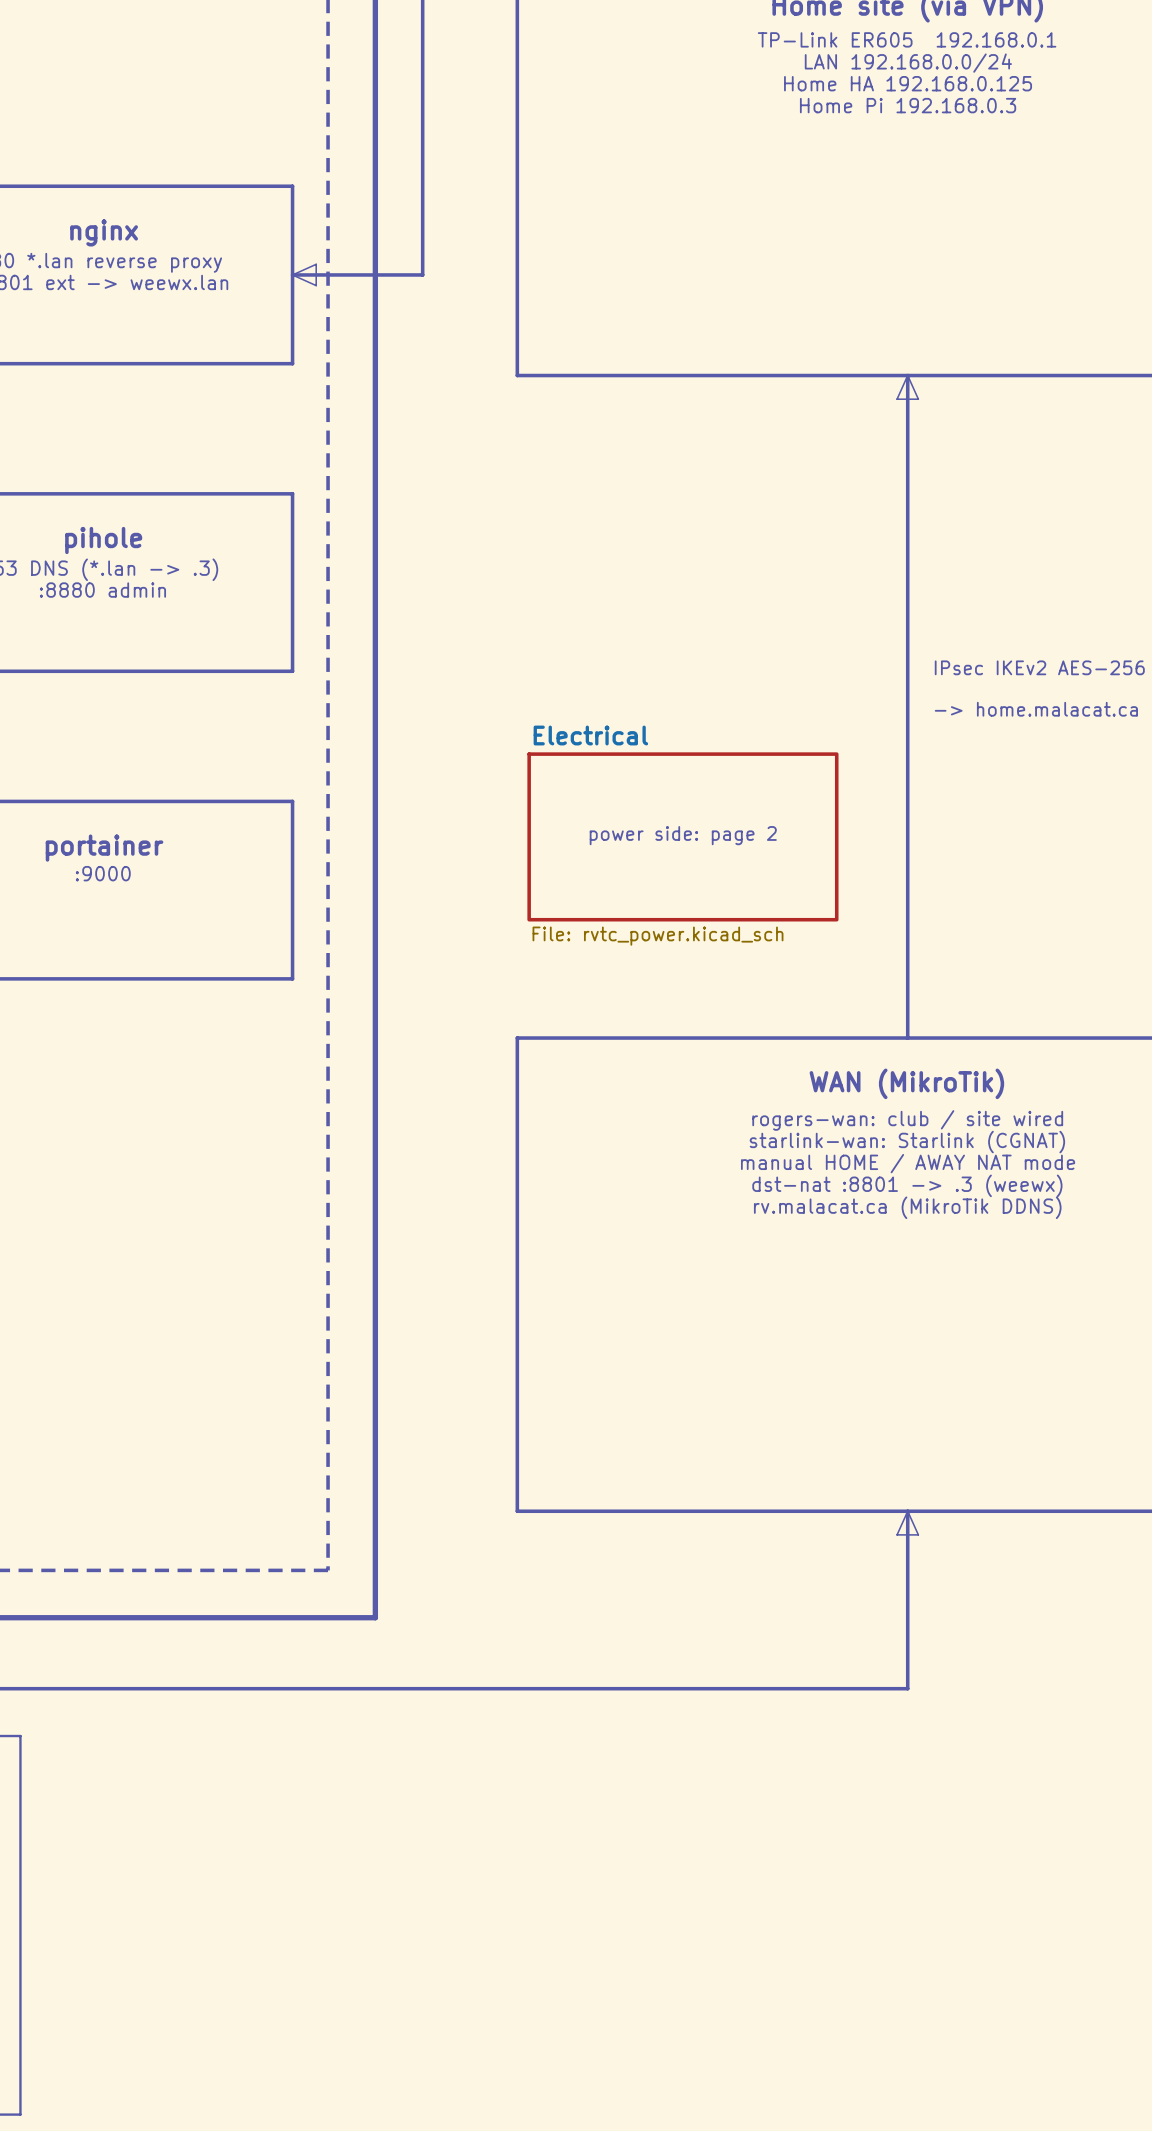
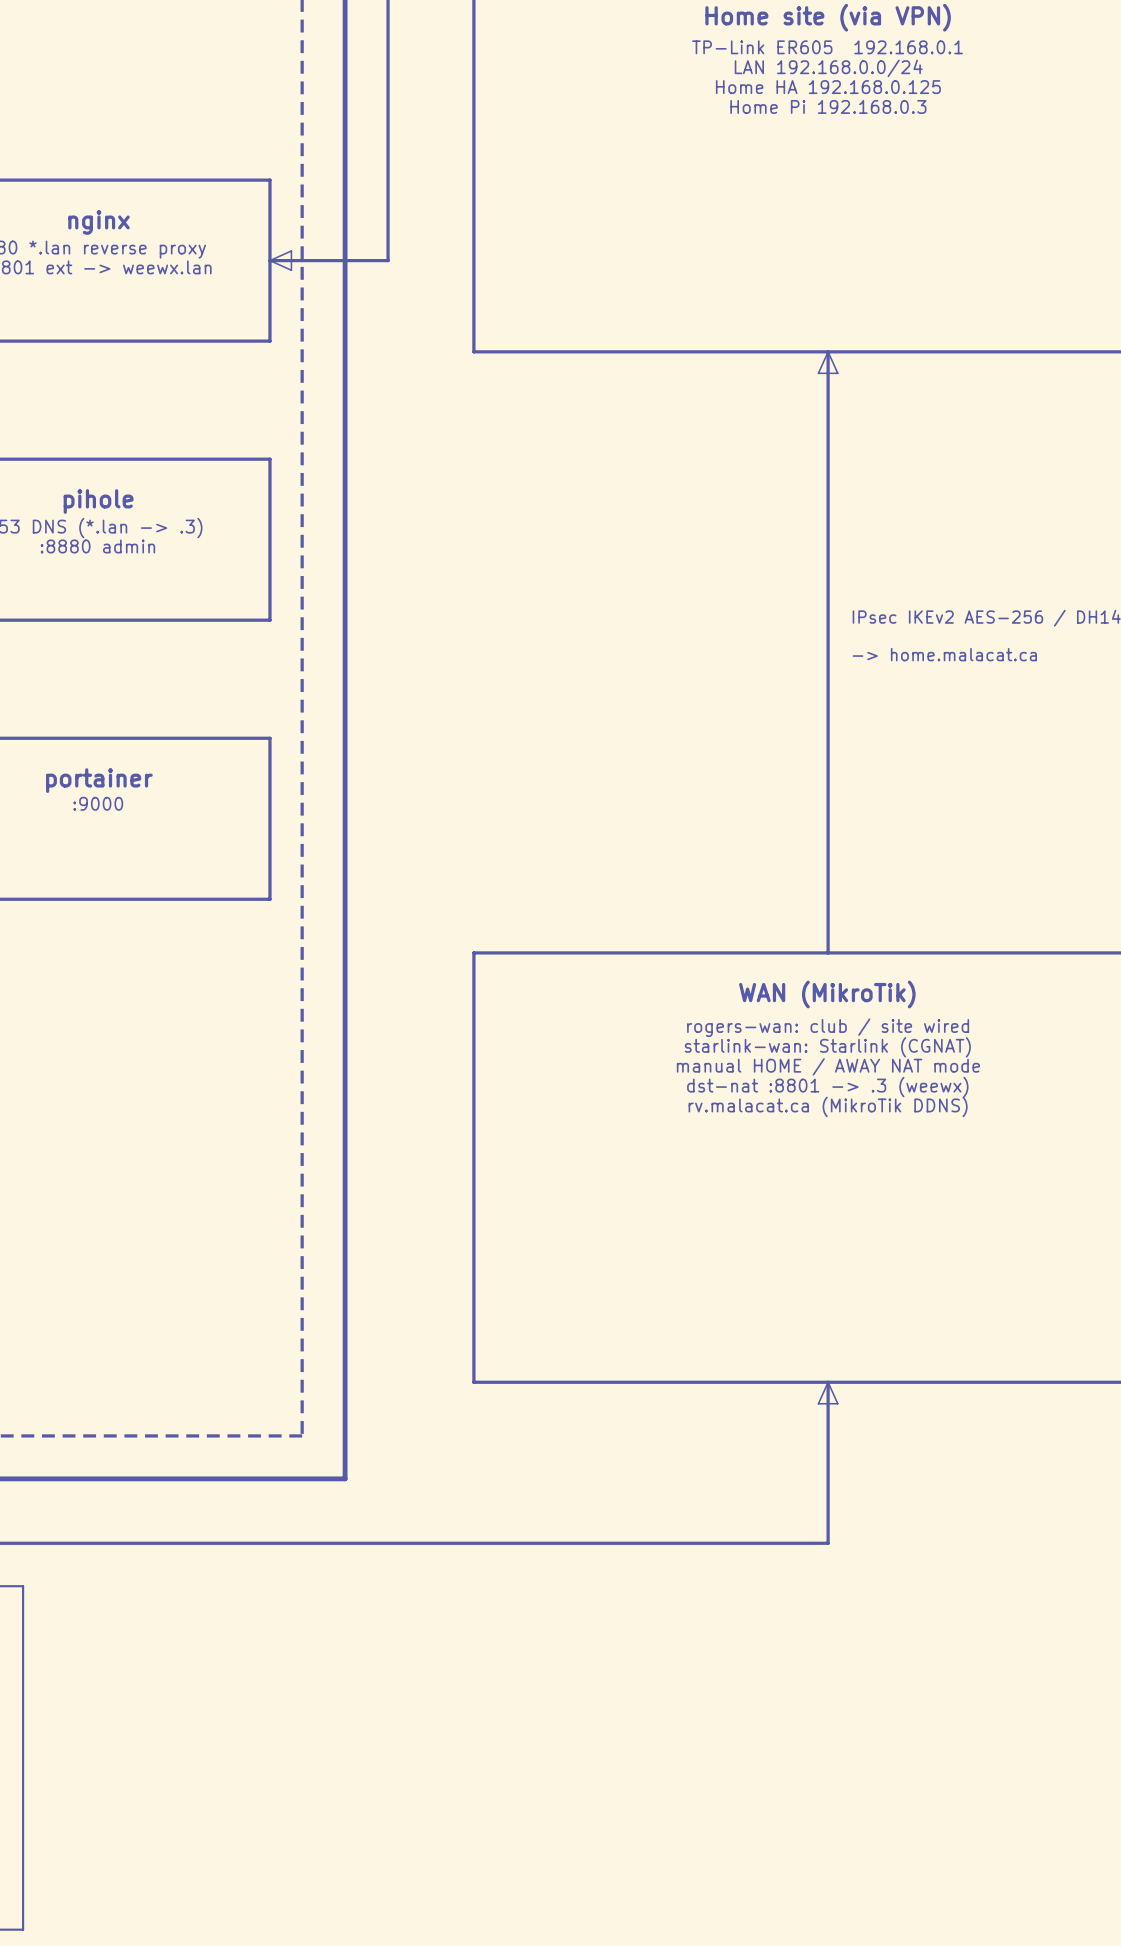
text: power side: page 2 (683, 835) -> none
sheet Electrical: File: rvtc_power.kicad_sch (682, 836) -> none

